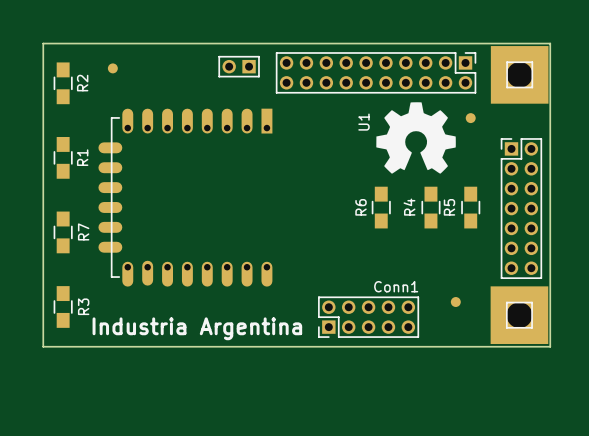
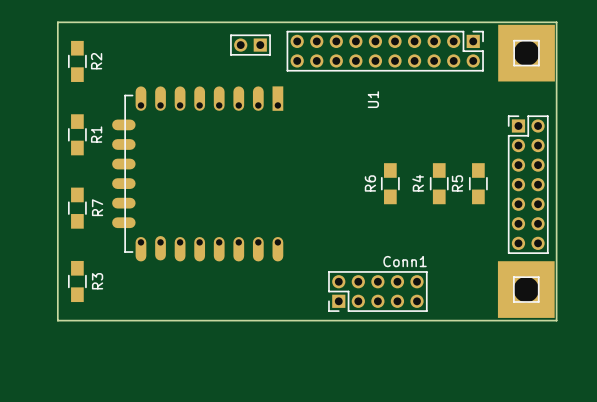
part: (112, 68) -> none
drawing: [376, 102, 456, 174] -> none
part: (470, 118) -> none
part: (455, 302) -> none
text: Industria Argentina (197, 328) -> none

